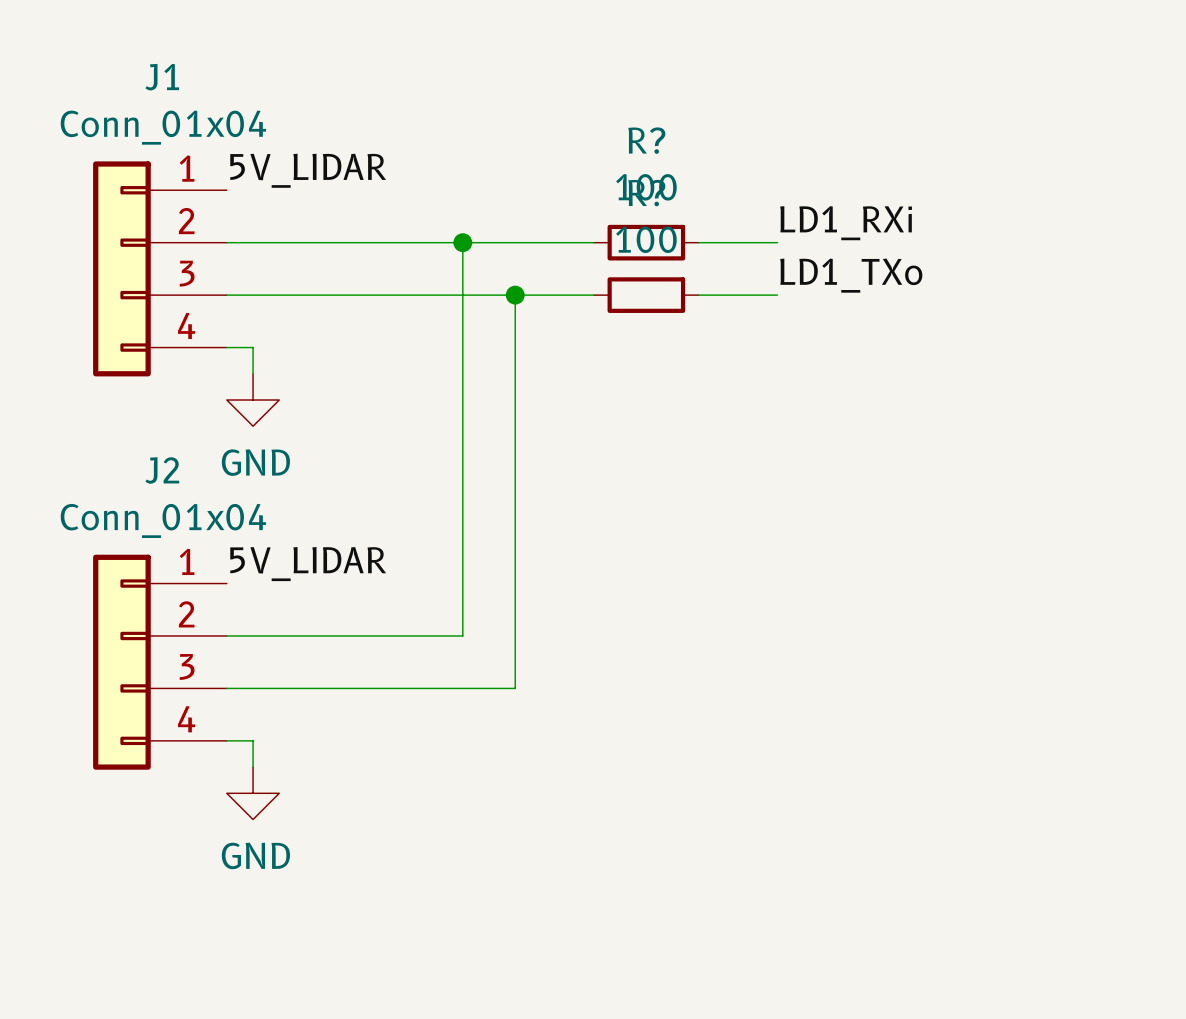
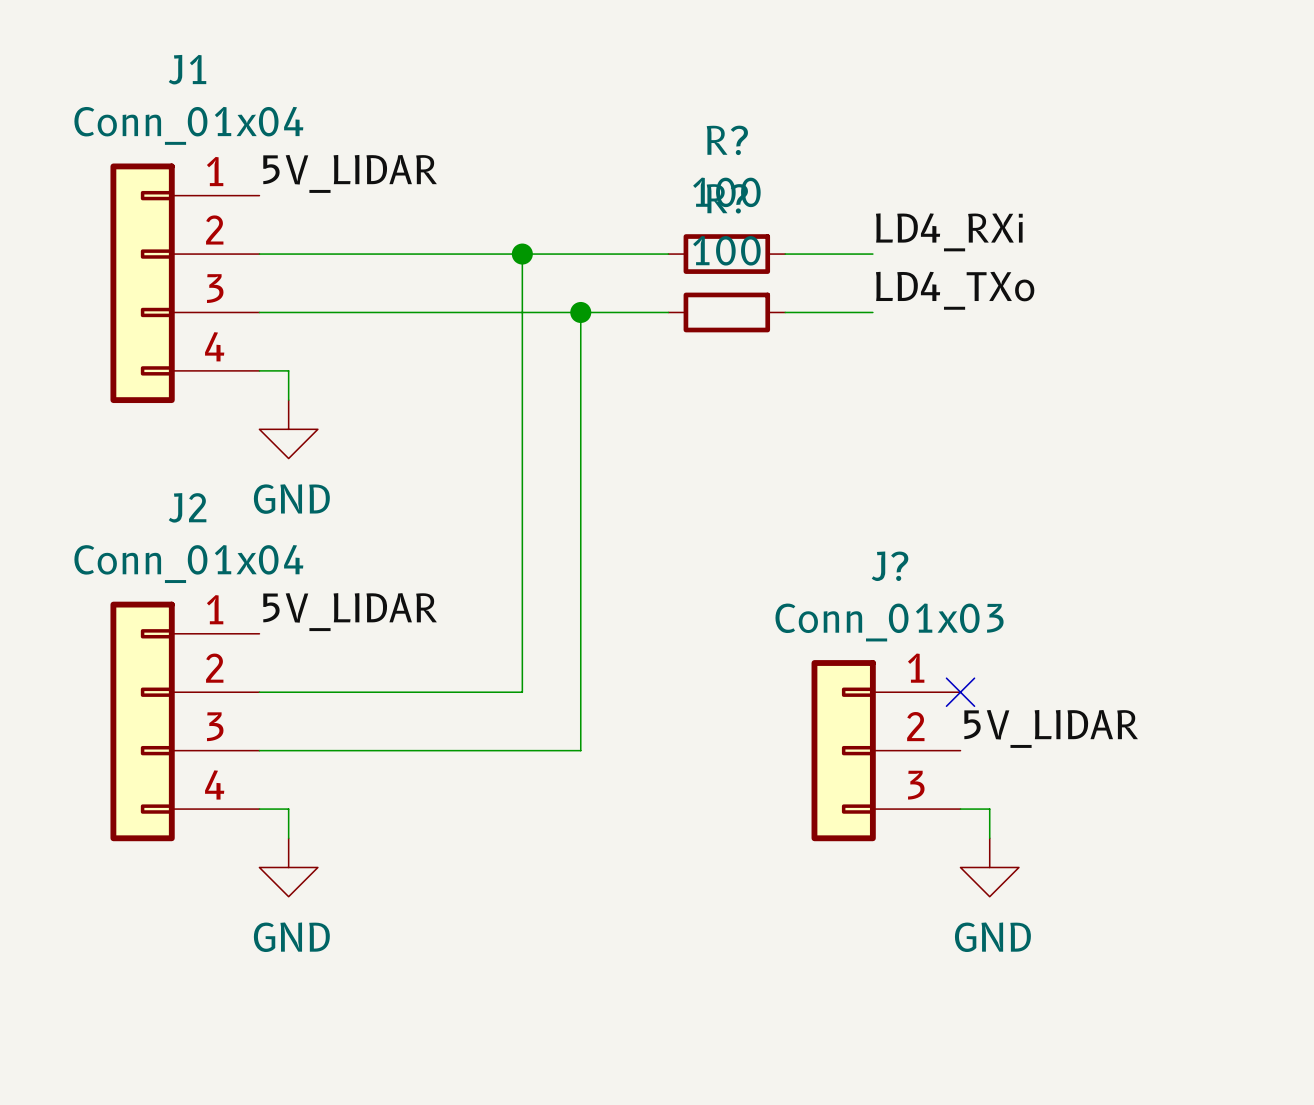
label: LD1_RXi (846, 223) -> LD4_RXi (949, 232)
label: LD1_TXo (851, 275) -> LD4_TXo (955, 290)
no-connect mark: none -> (960, 692)
label: none -> 5V_LIDAR (1051, 728)
J?: none -> Conn_01x03 (886, 750)
wire: none -> (960, 809) (989, 809) (989, 838)
power symbol: none -> GND (989, 867)

